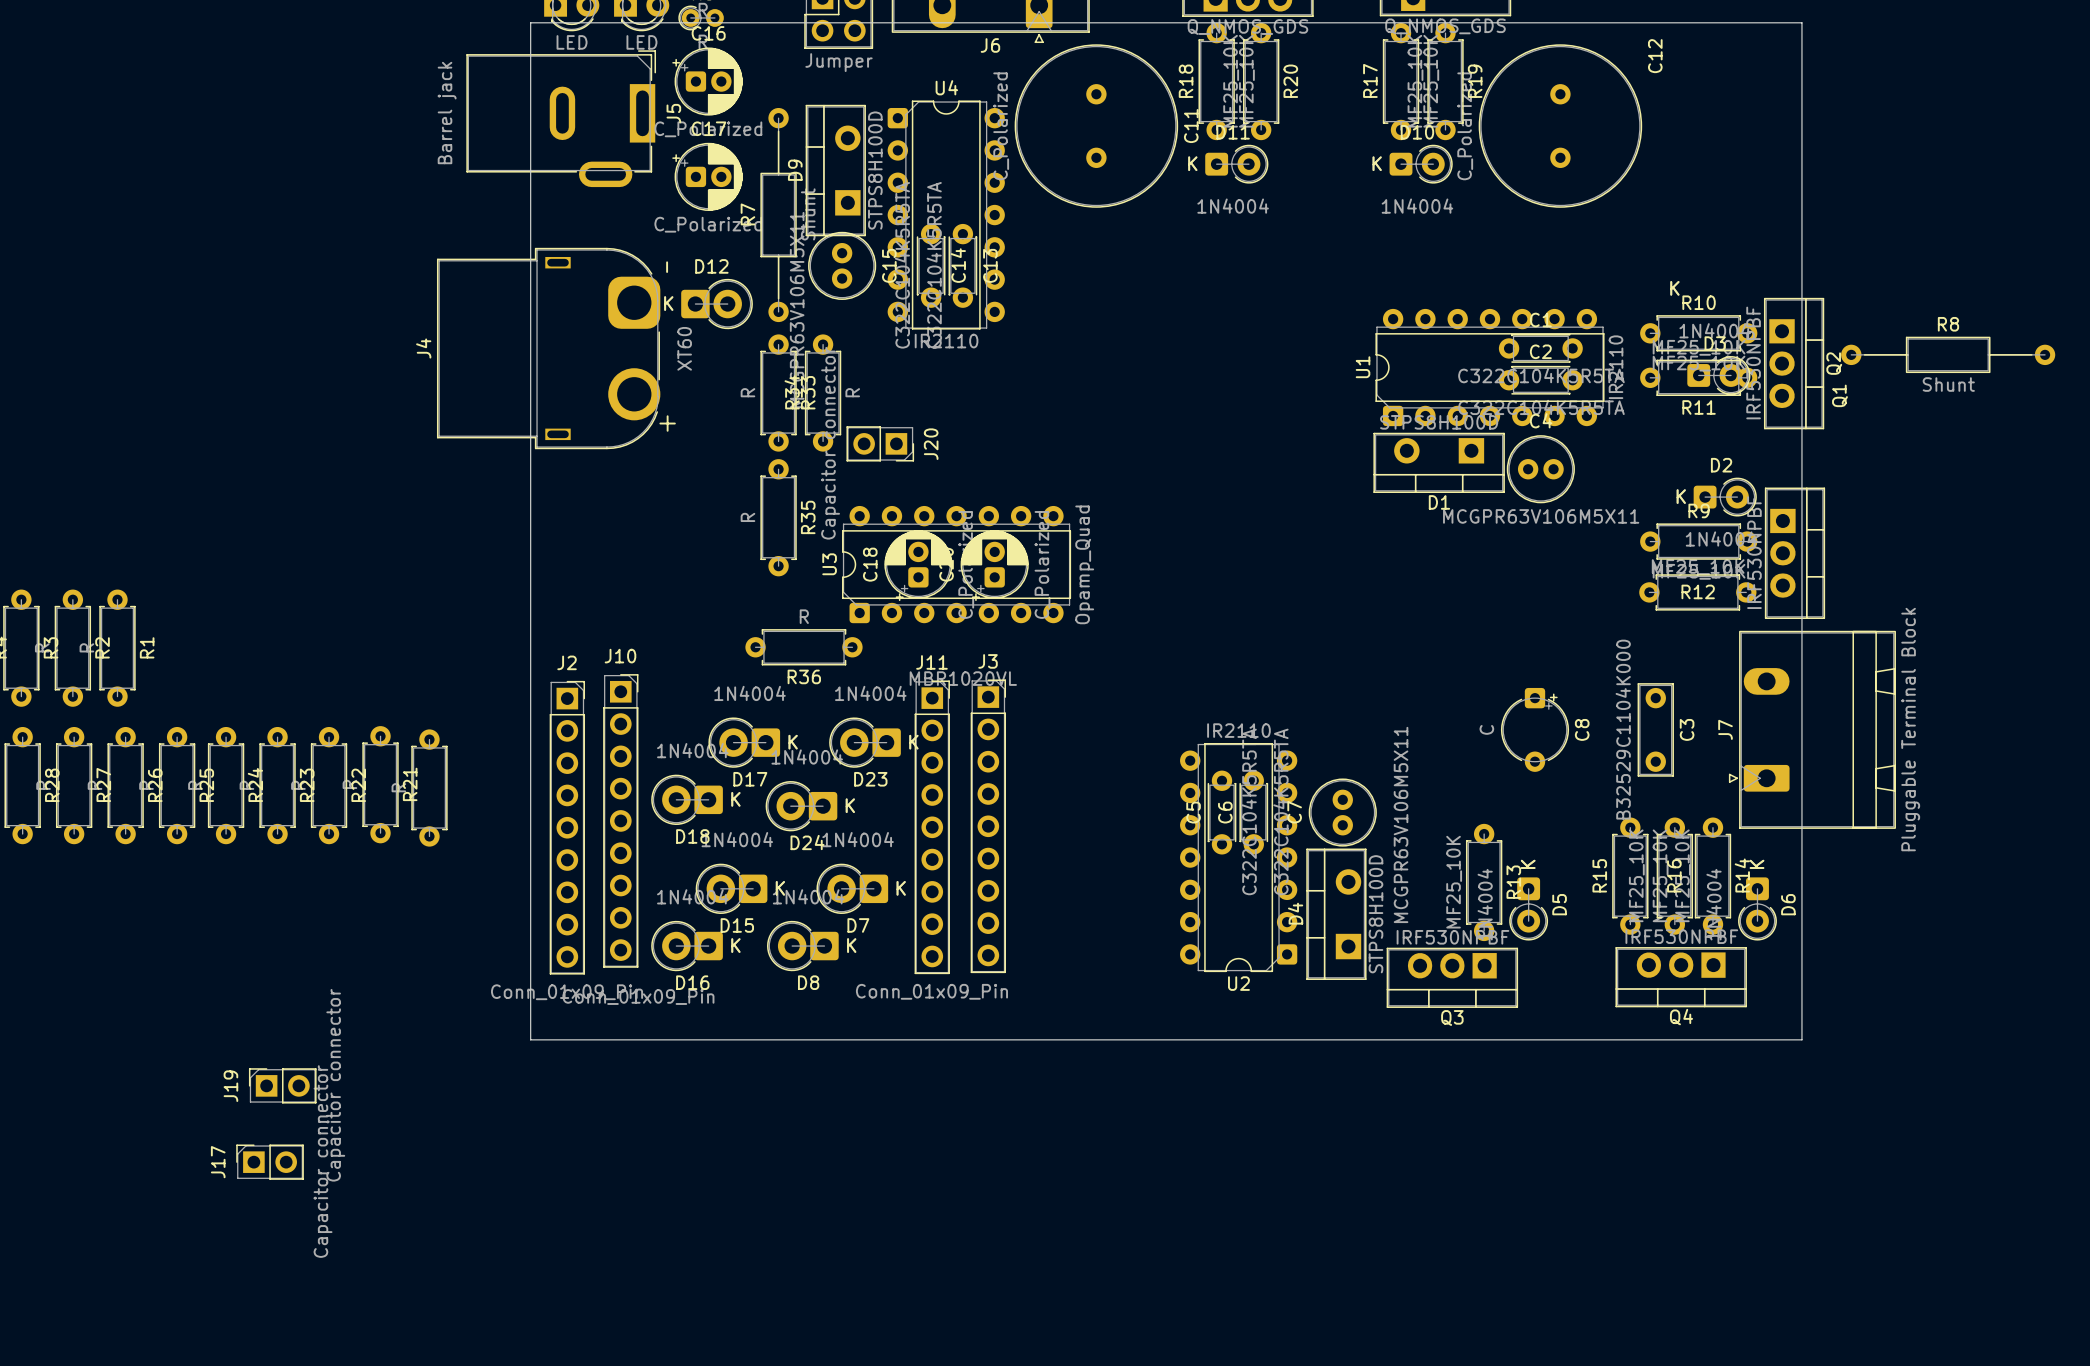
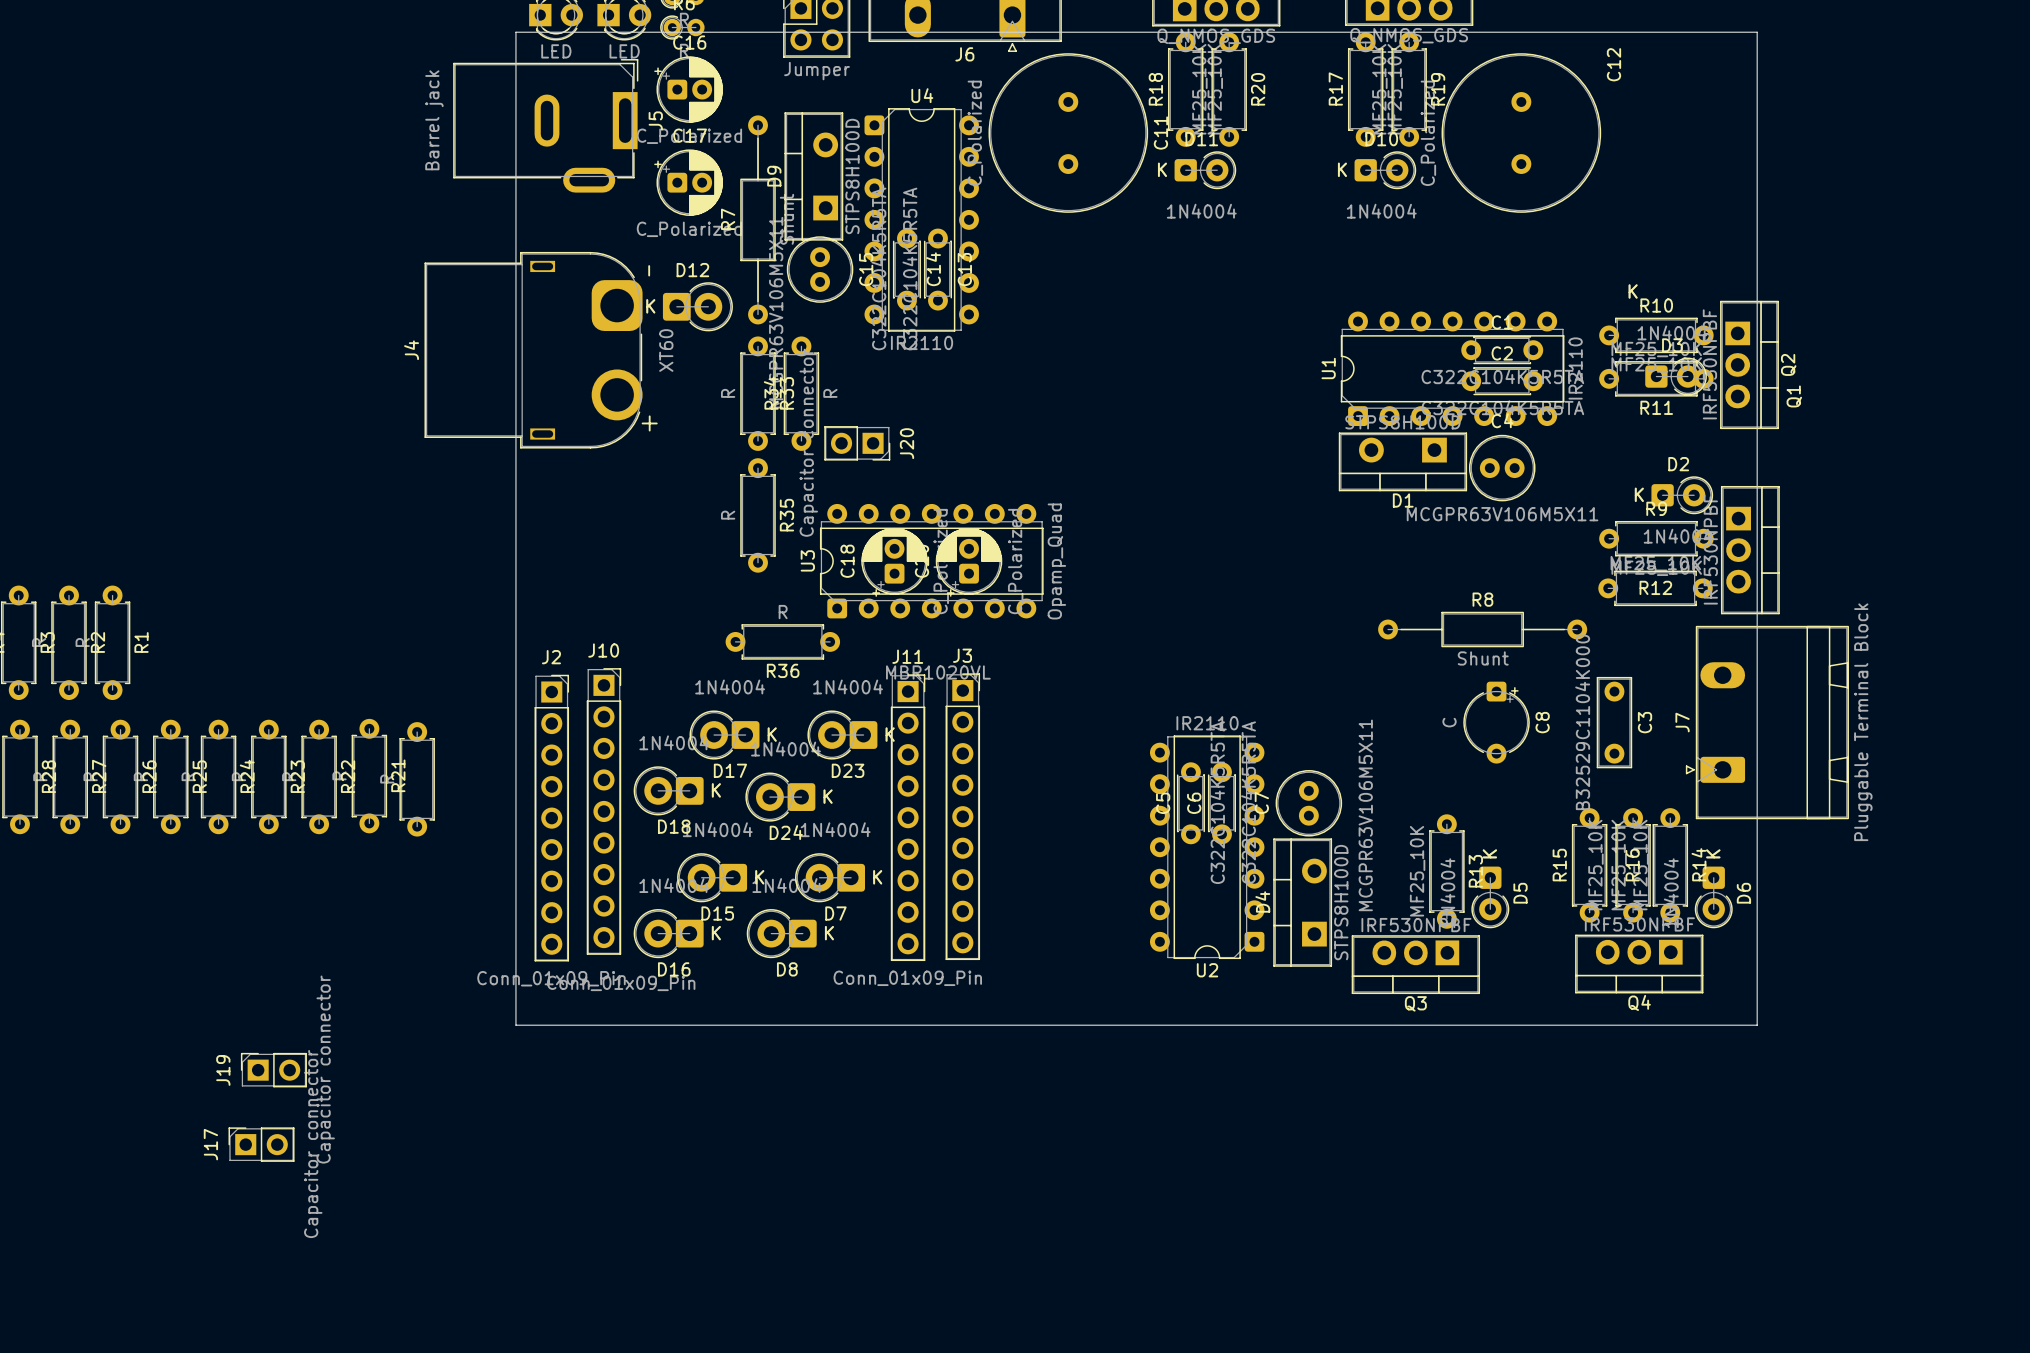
R8 position: (1948, 354) -> (1482, 629)

